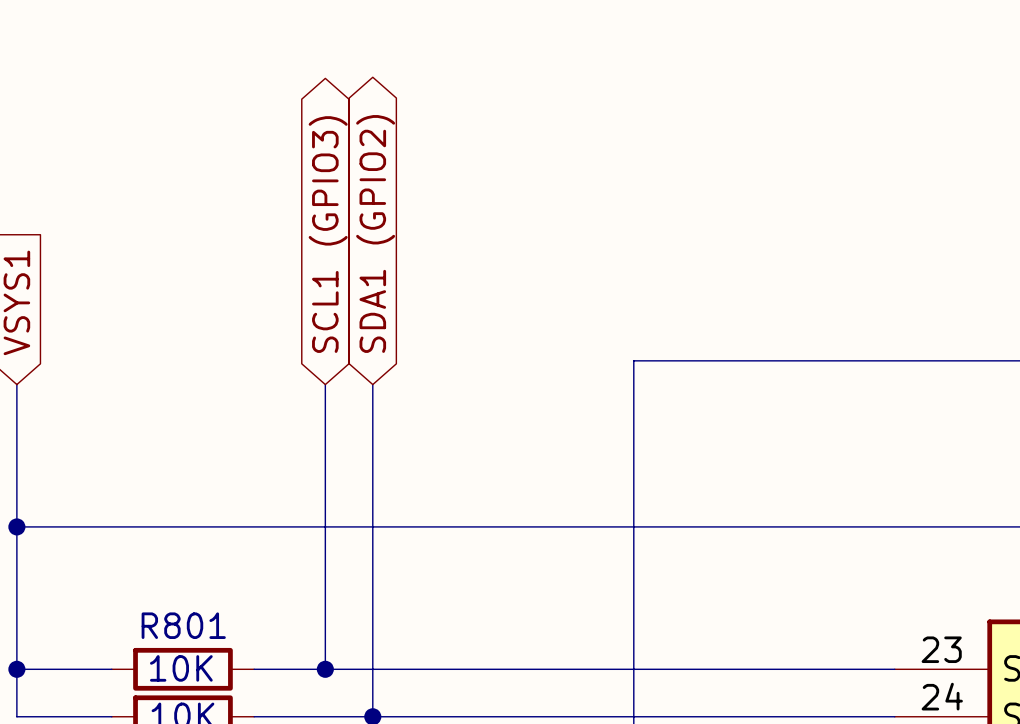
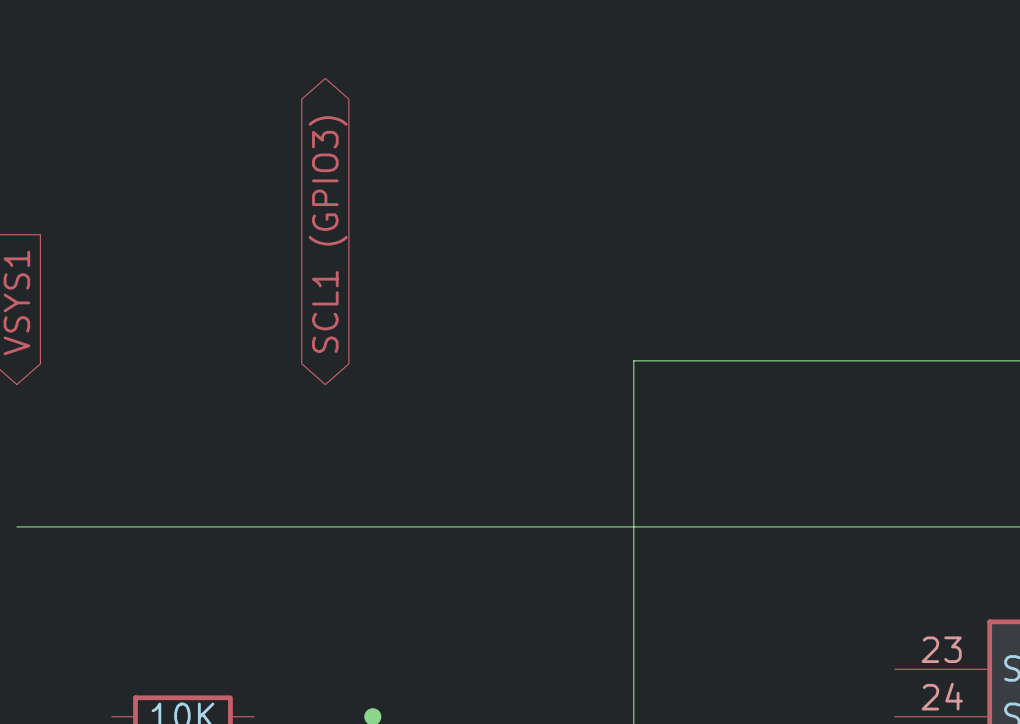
global label: SDA1 (GPIO2) (375, 233) -> none
wire: (16, 384) (16, 716) (111, 716) -> none
wire: (325, 384) (325, 669) -> none
wire: (372, 384) (372, 716) -> none
junction: (16, 526) -> none
wire: (16, 669) (111, 669) -> none
junction: (16, 669) -> none
R801: 10K (182, 669) -> none
wire: (254, 669) (894, 669) -> none
junction: (325, 669) -> none
wire: (254, 716) (894, 716) -> none

